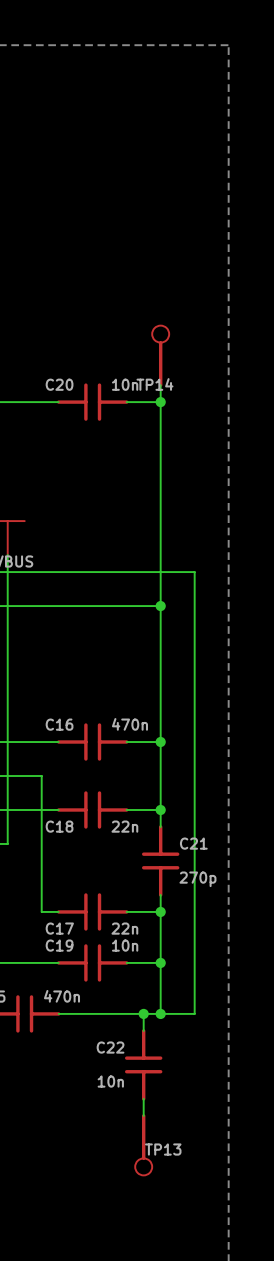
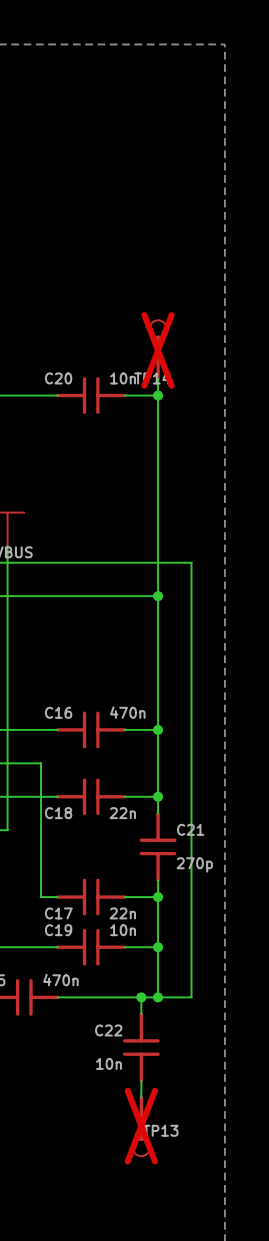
TP14 do-not-place cross: none -> (158, 350)
TP13 do-not-place cross: none -> (141, 1126)

